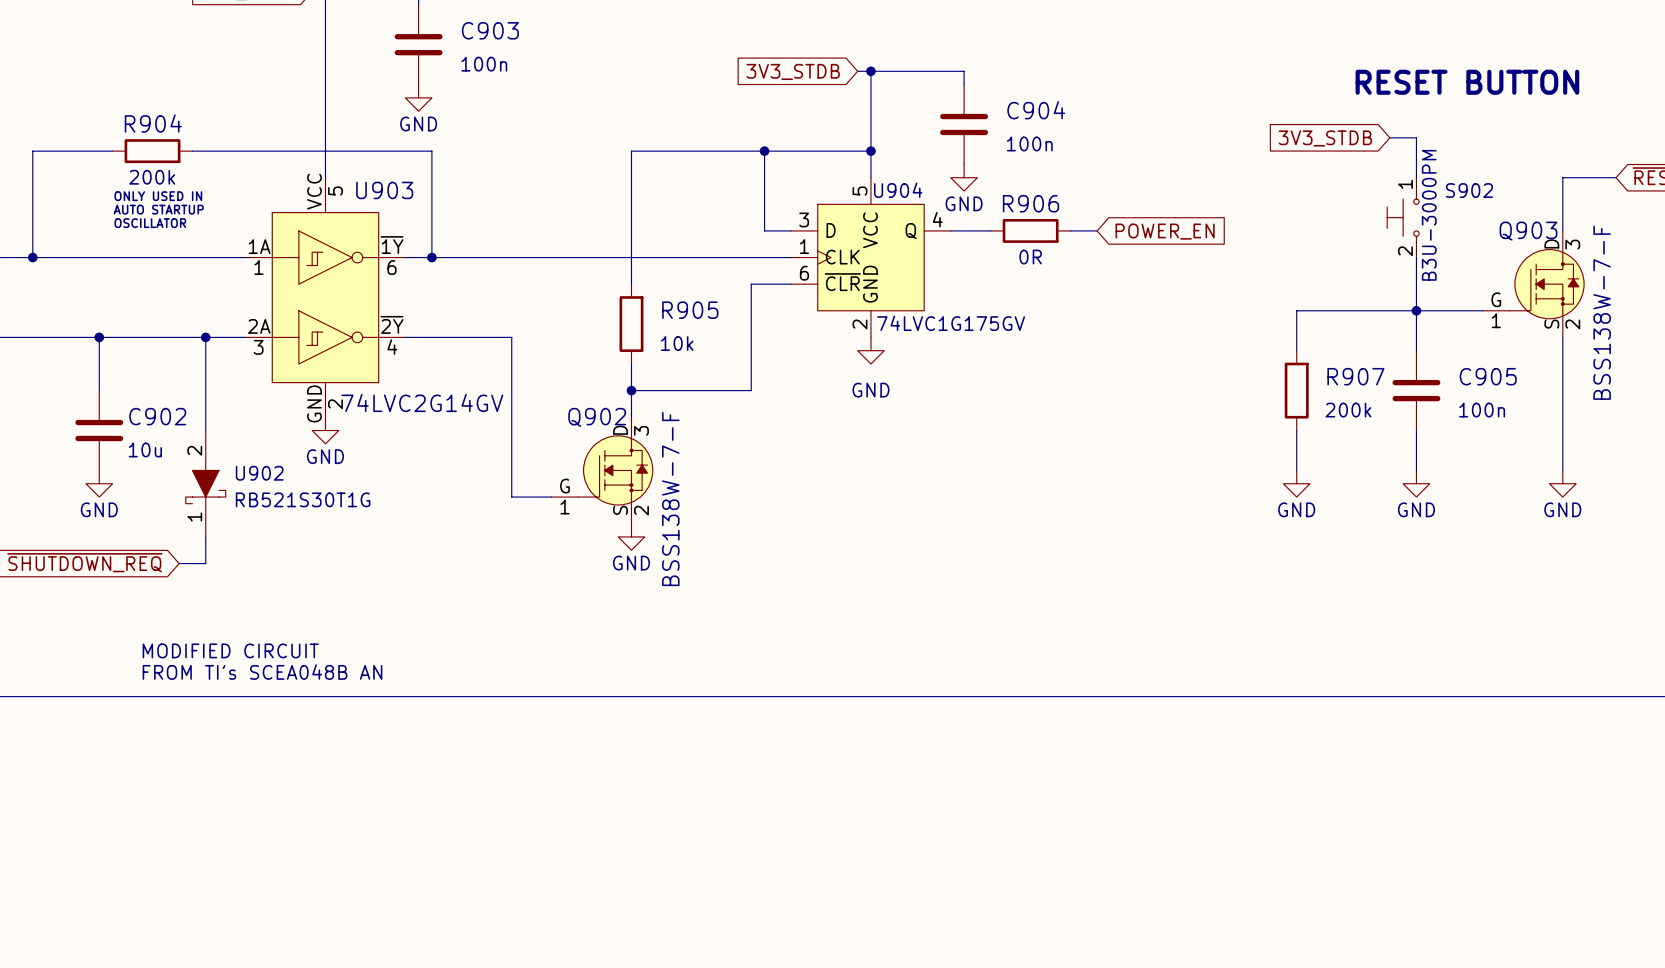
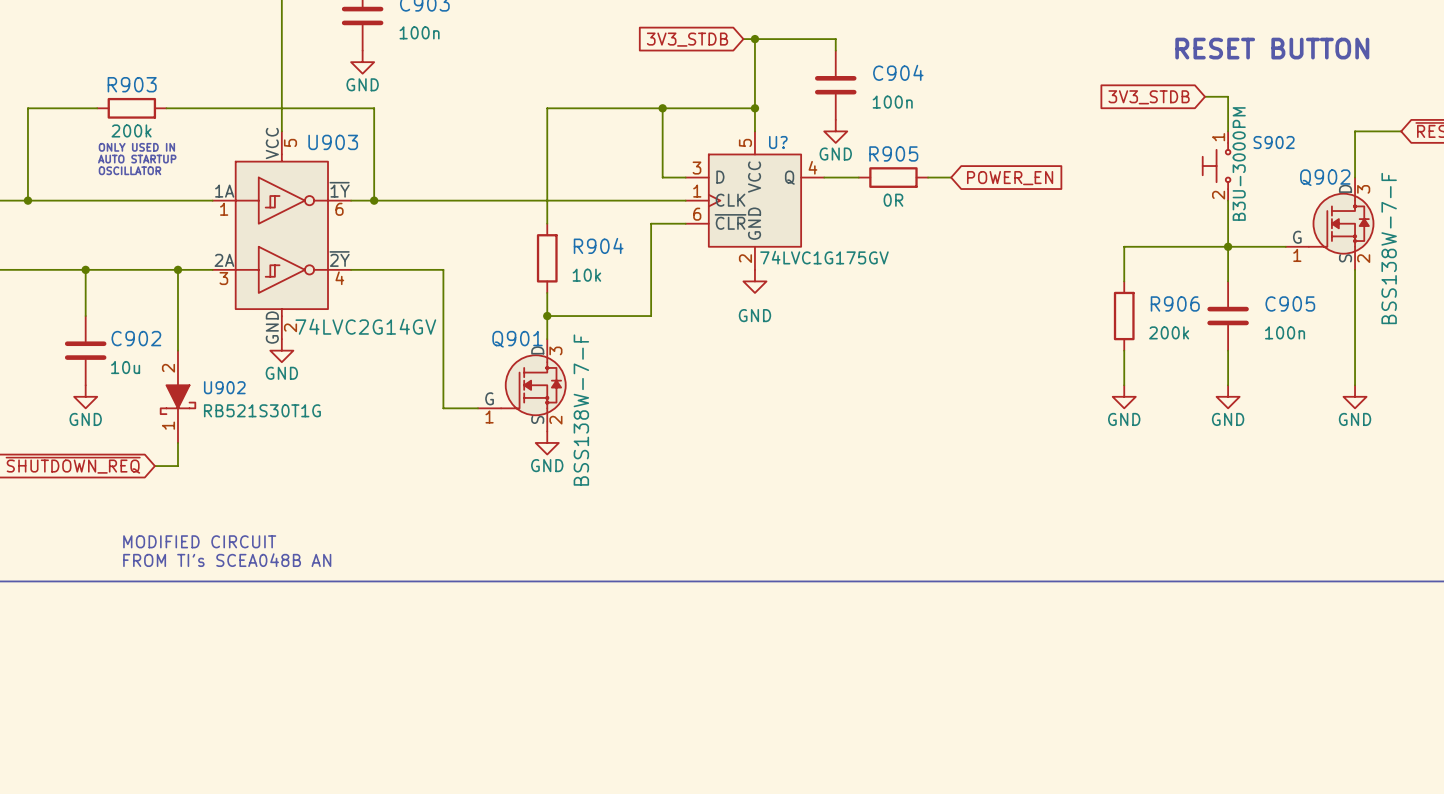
R904 name: R904 (153, 123) -> R903 (132, 84)
U904 name: U904 (898, 190) -> U? (778, 142)
R906 name: R906 (1031, 203) -> R905 (893, 153)
Q903 name: Q903 (1528, 231) -> Q902 (1325, 177)
R905 name: R905 (690, 310) -> R904 (598, 245)
R907 name: R907 (1355, 376) -> R906 (1175, 303)
Q902 name: Q902 (597, 417) -> Q901 (517, 339)

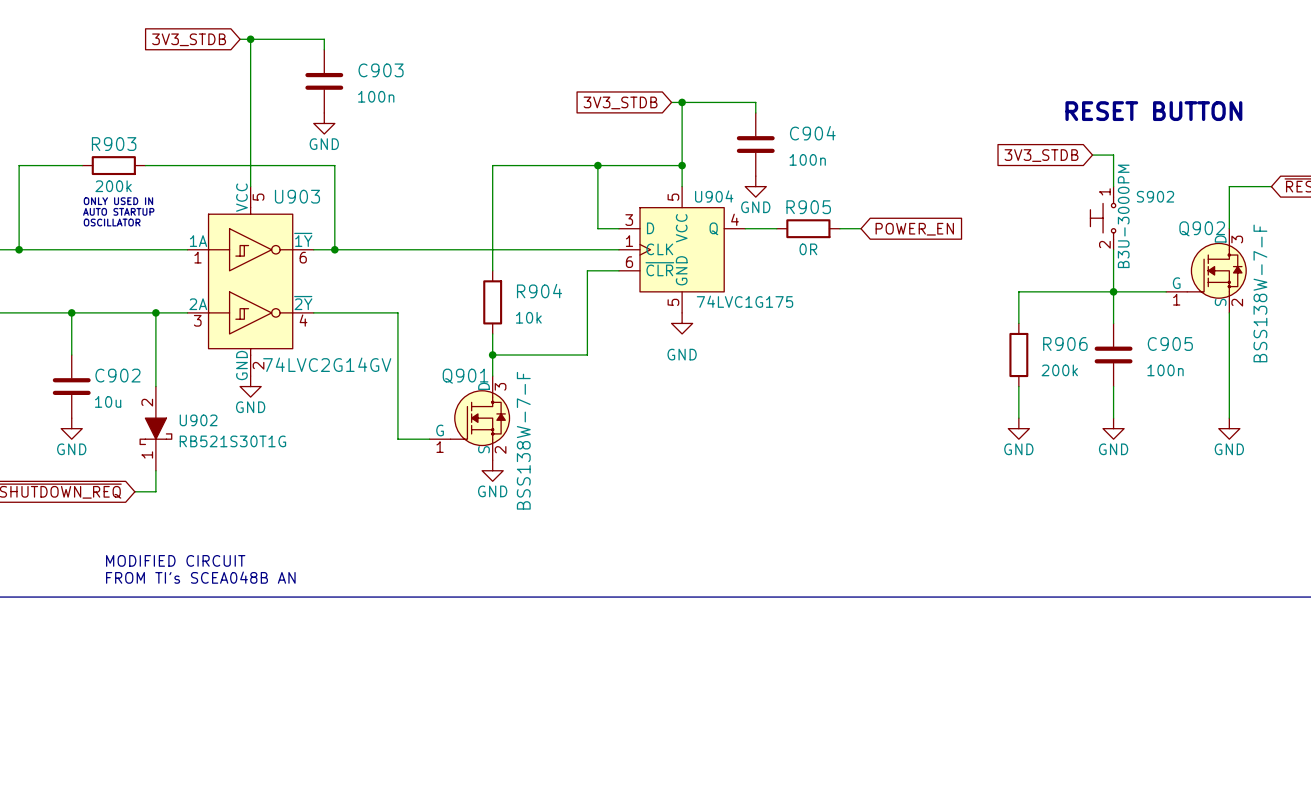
U? name: U? (778, 142) -> U904 (714, 196)
U? value: 74LVC1G175GV (824, 257) -> 74LVC1G175 (744, 301)
U? pin number: 2 (745, 258) -> 5 (673, 302)

